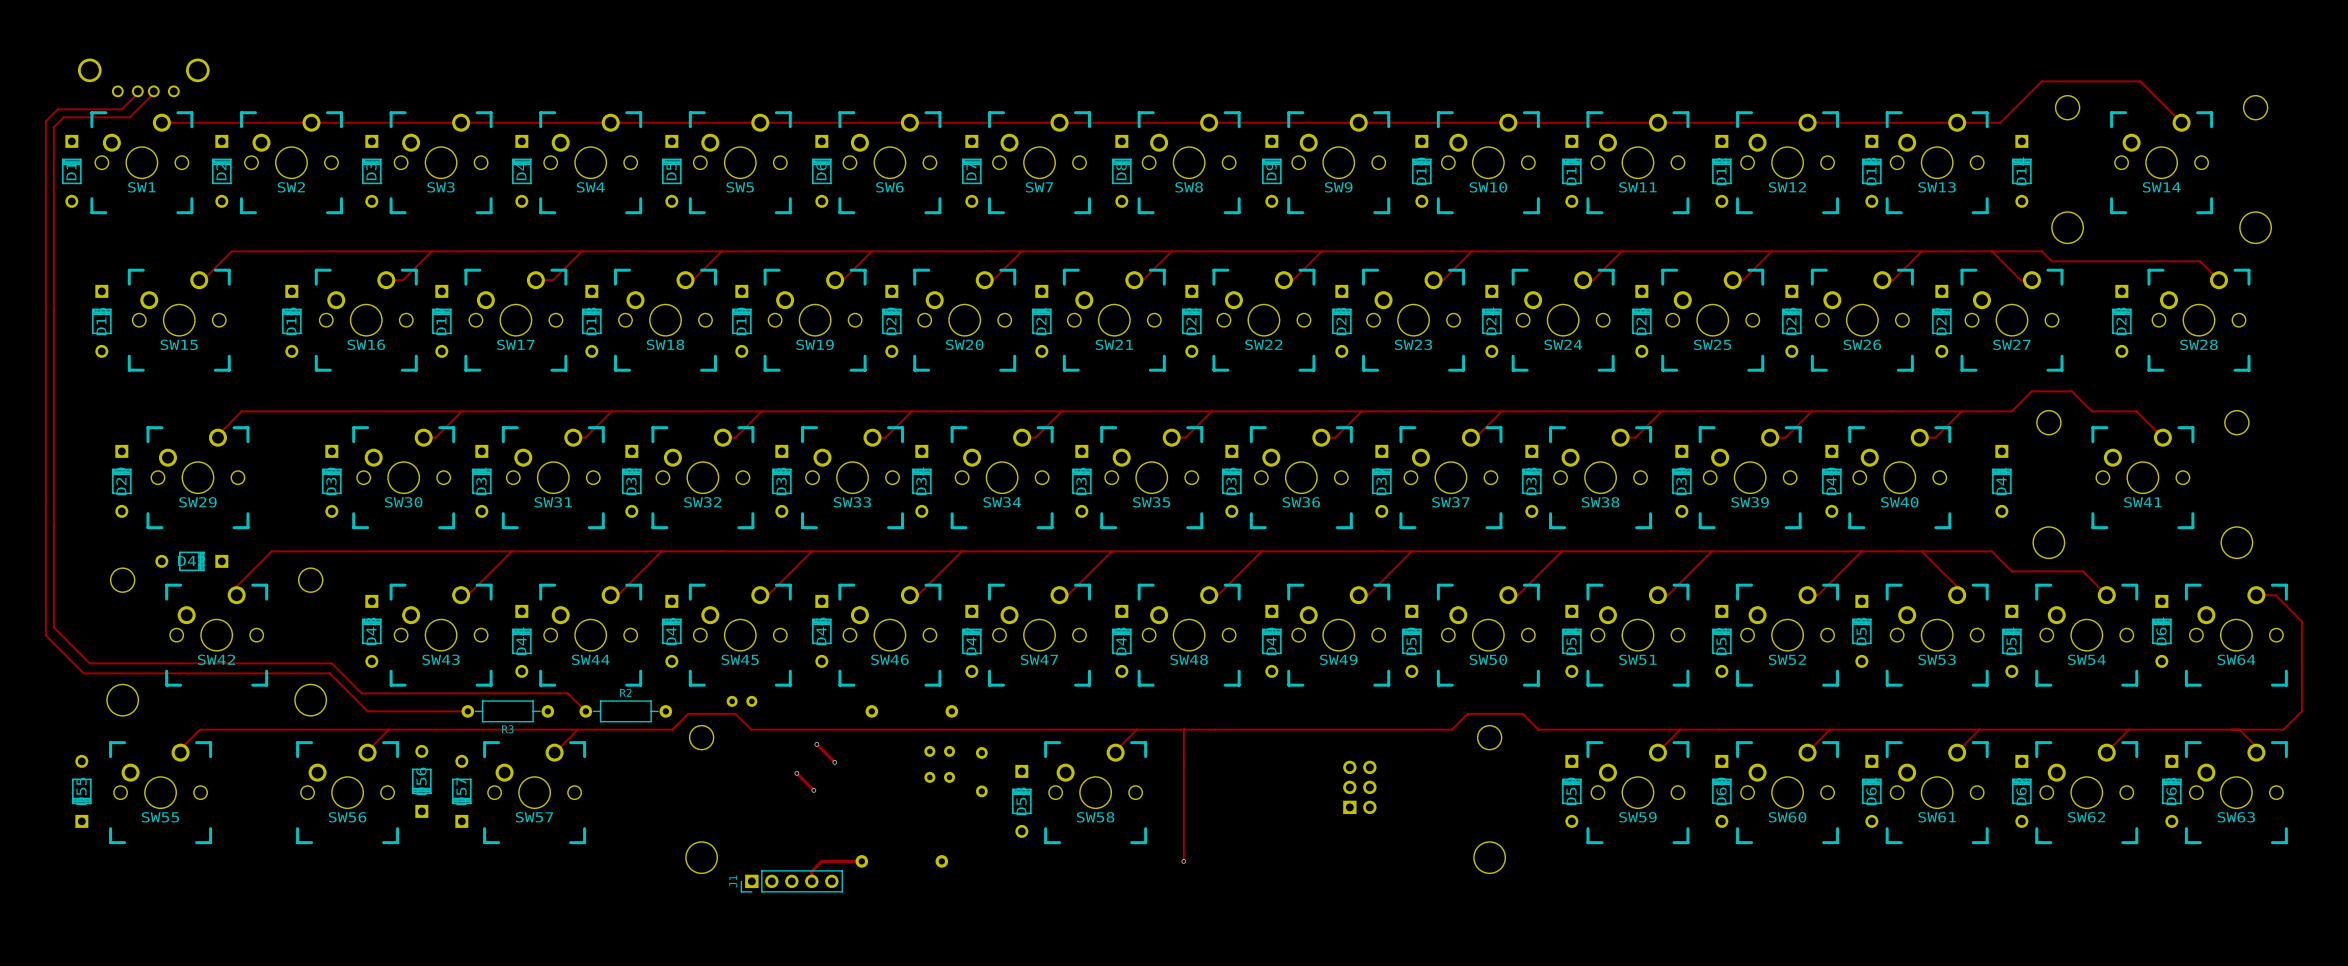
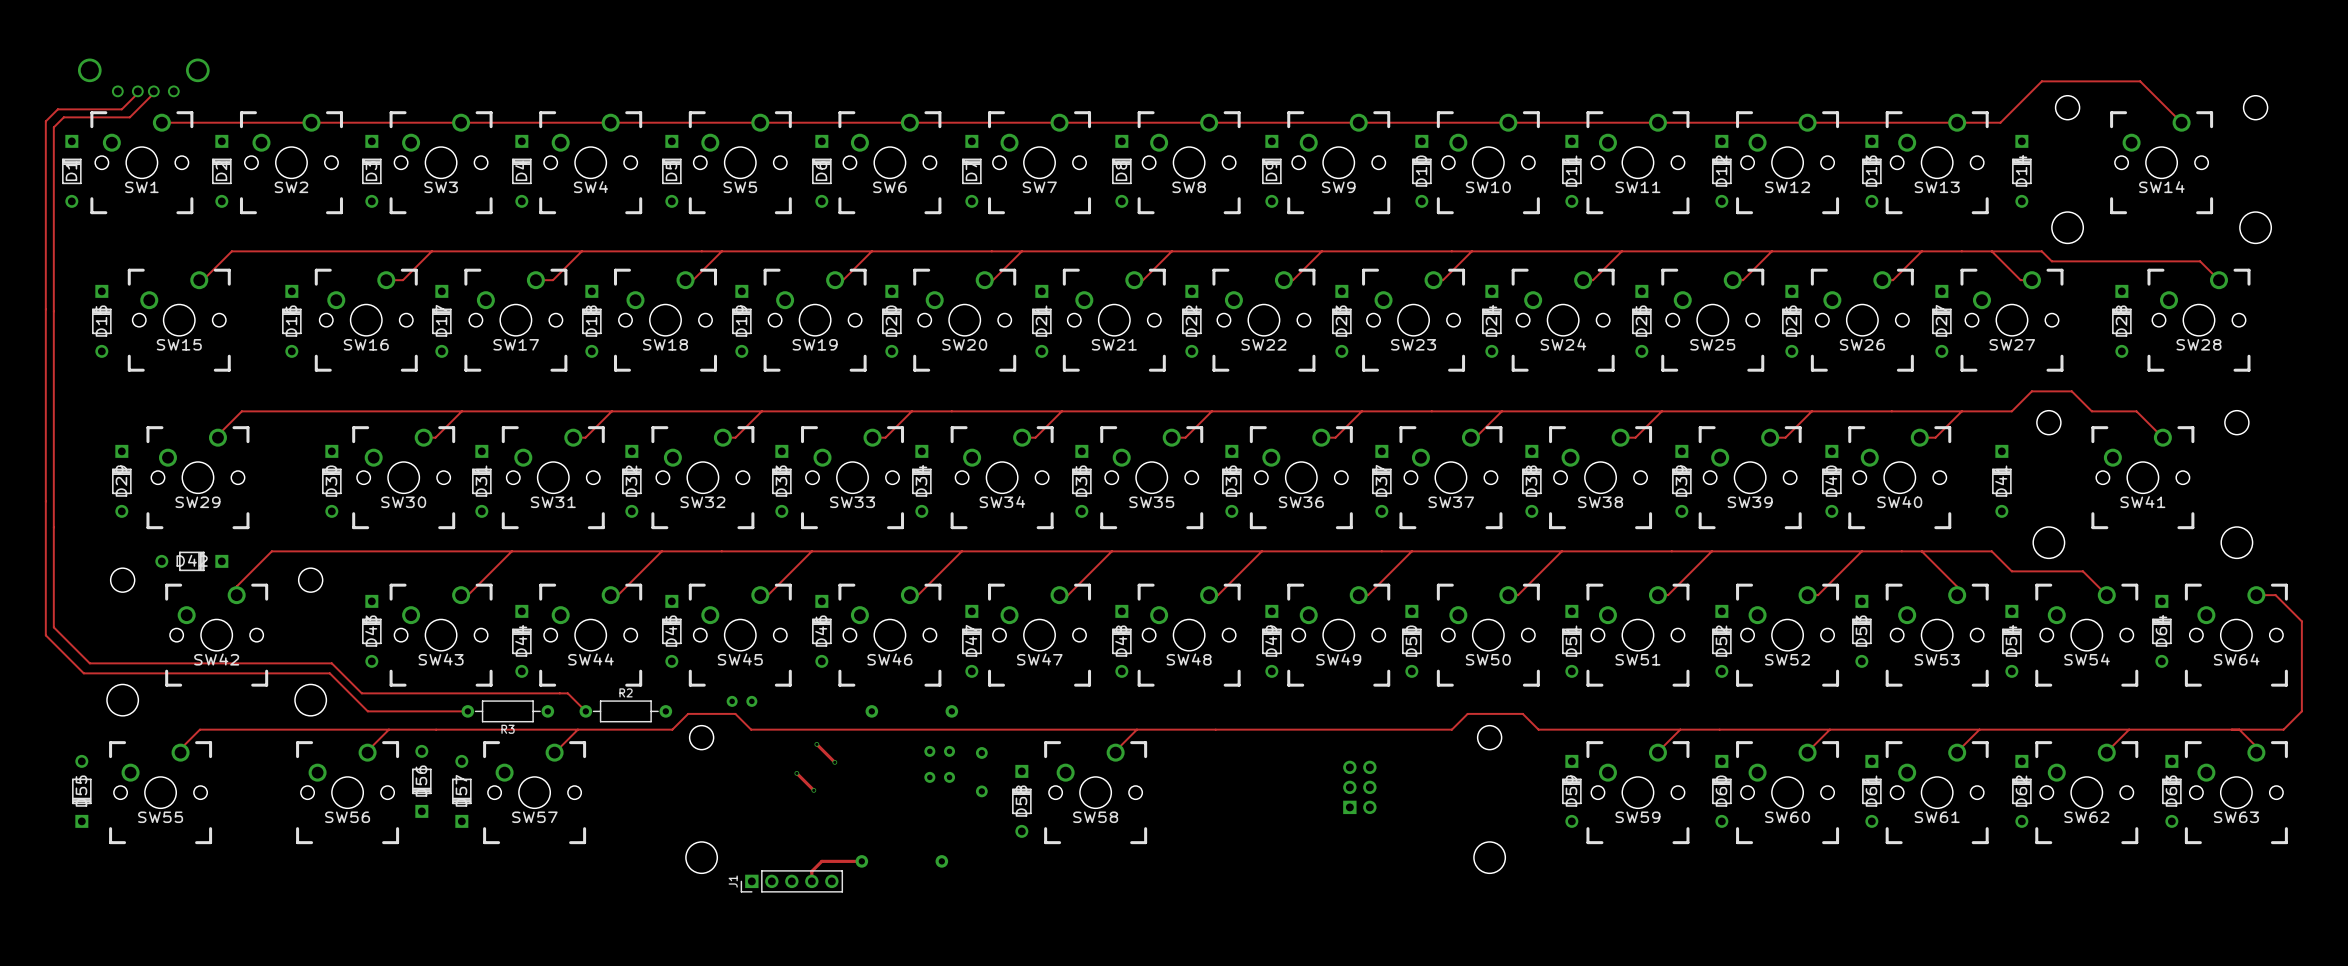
track: (1183, 729) (1183, 861) -> none
via: (1183, 861) -> none

